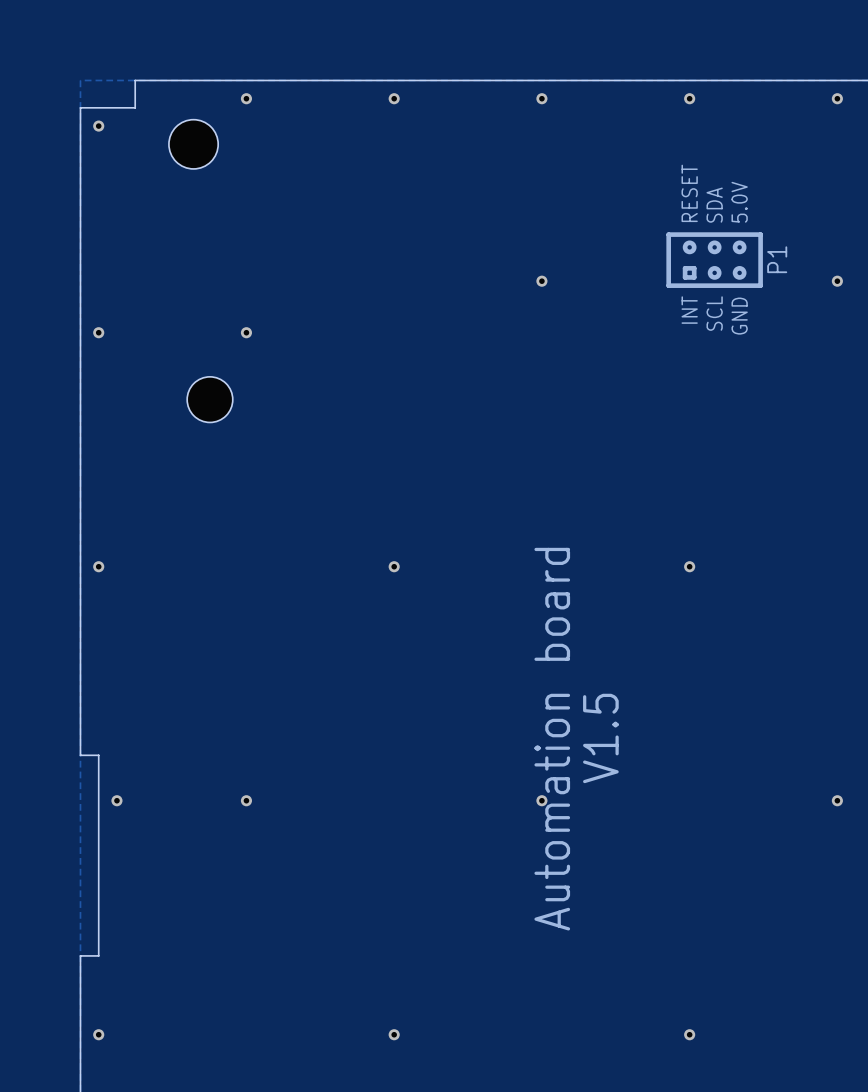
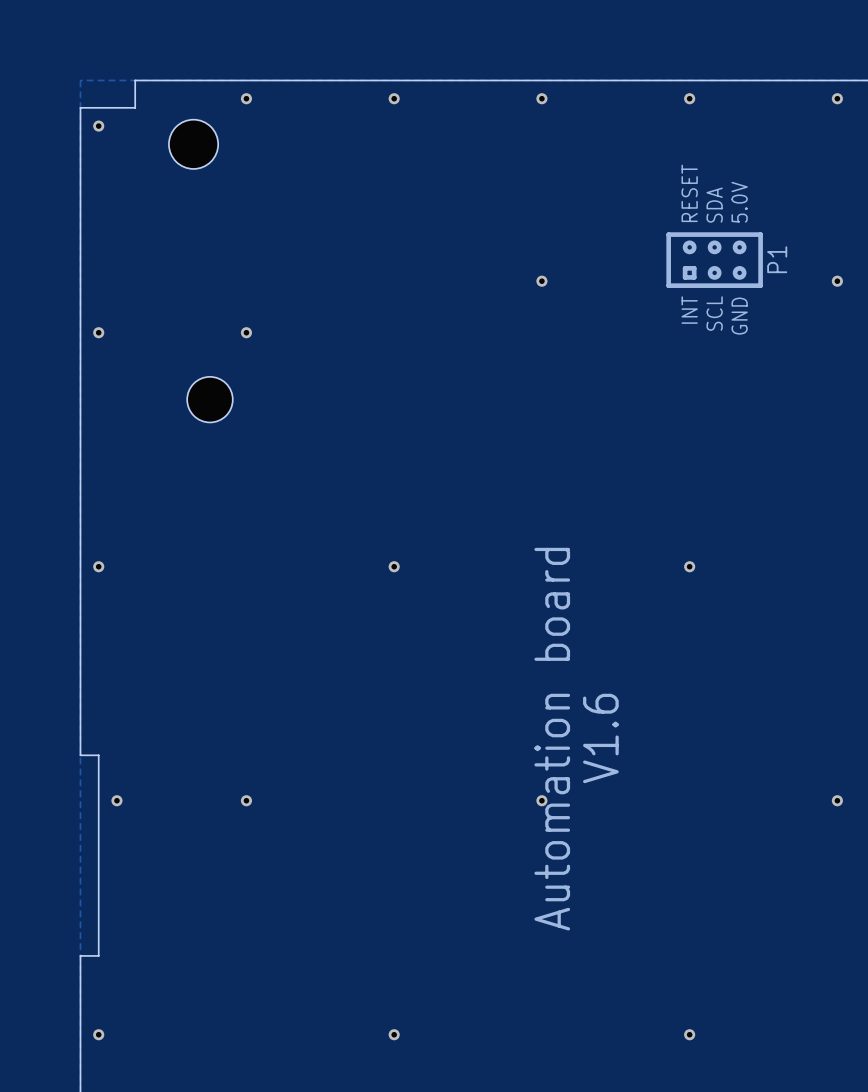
text: V1.5 (600, 738) -> V1.6 (600, 738)

